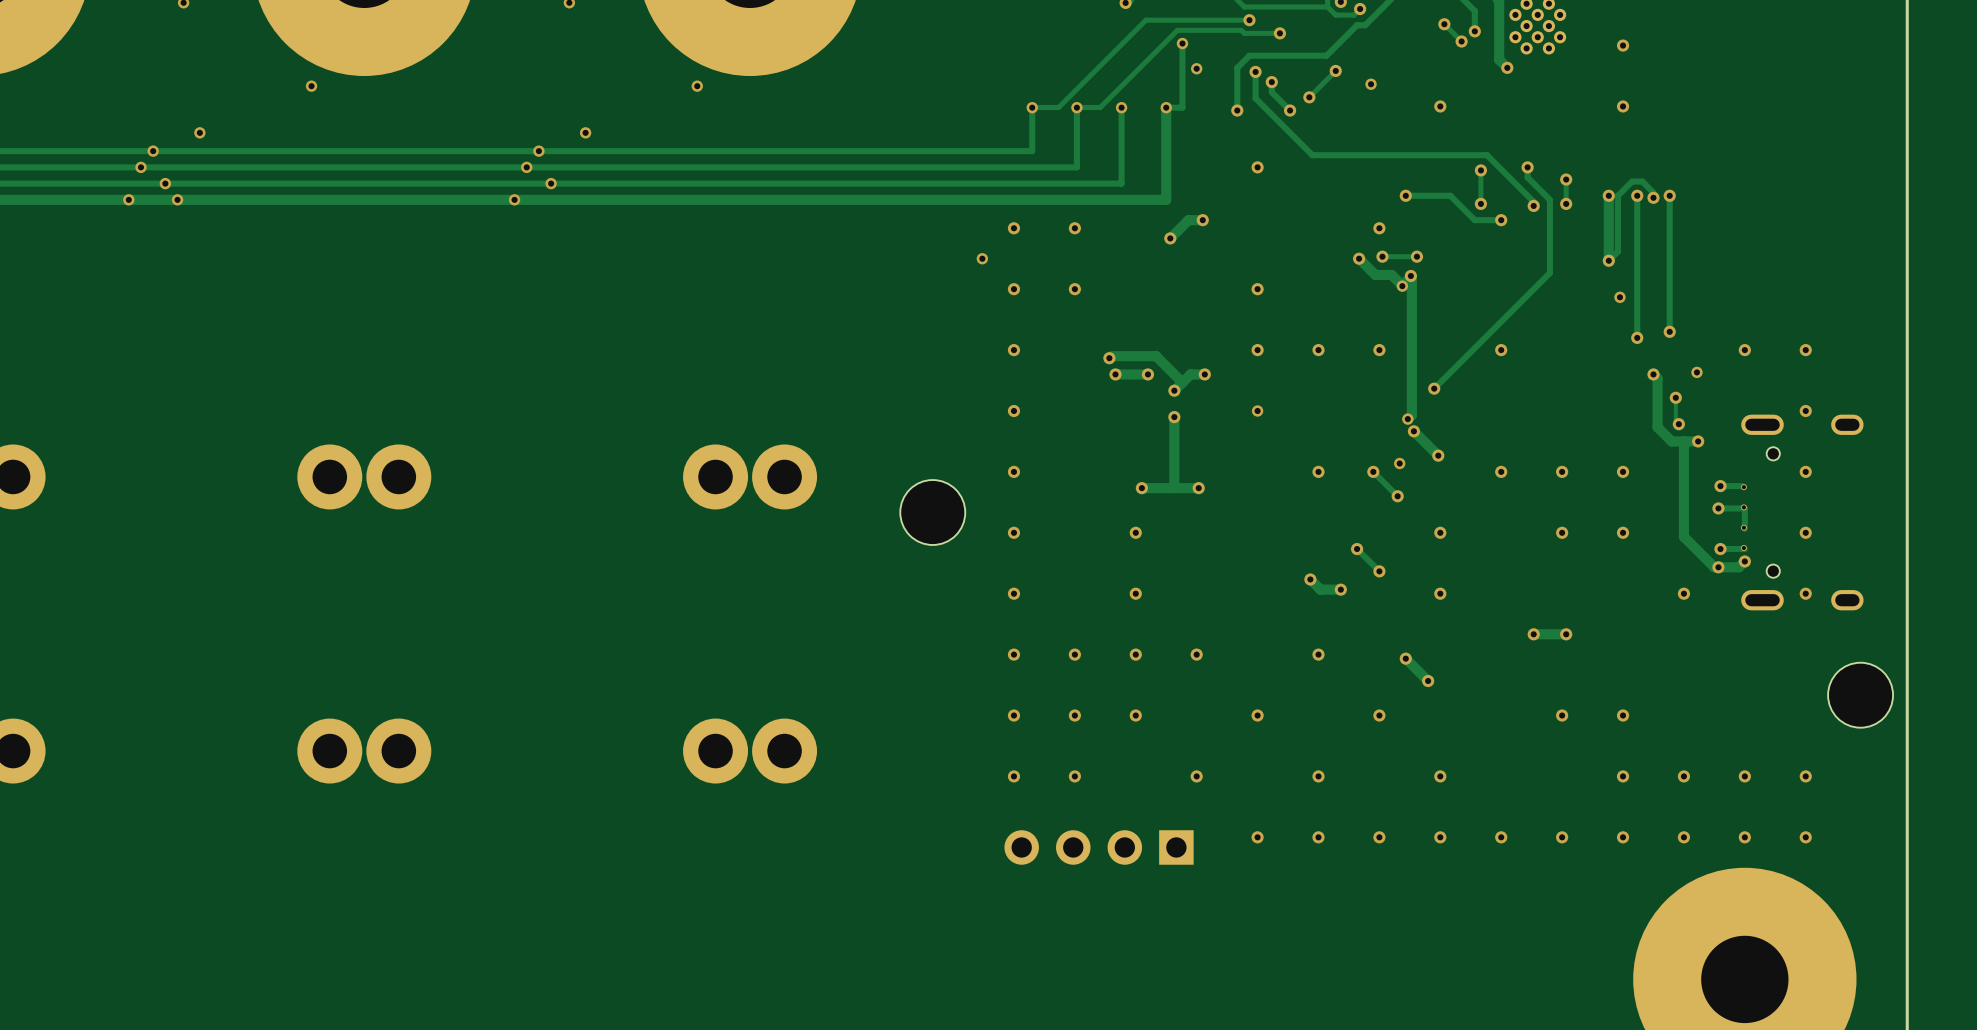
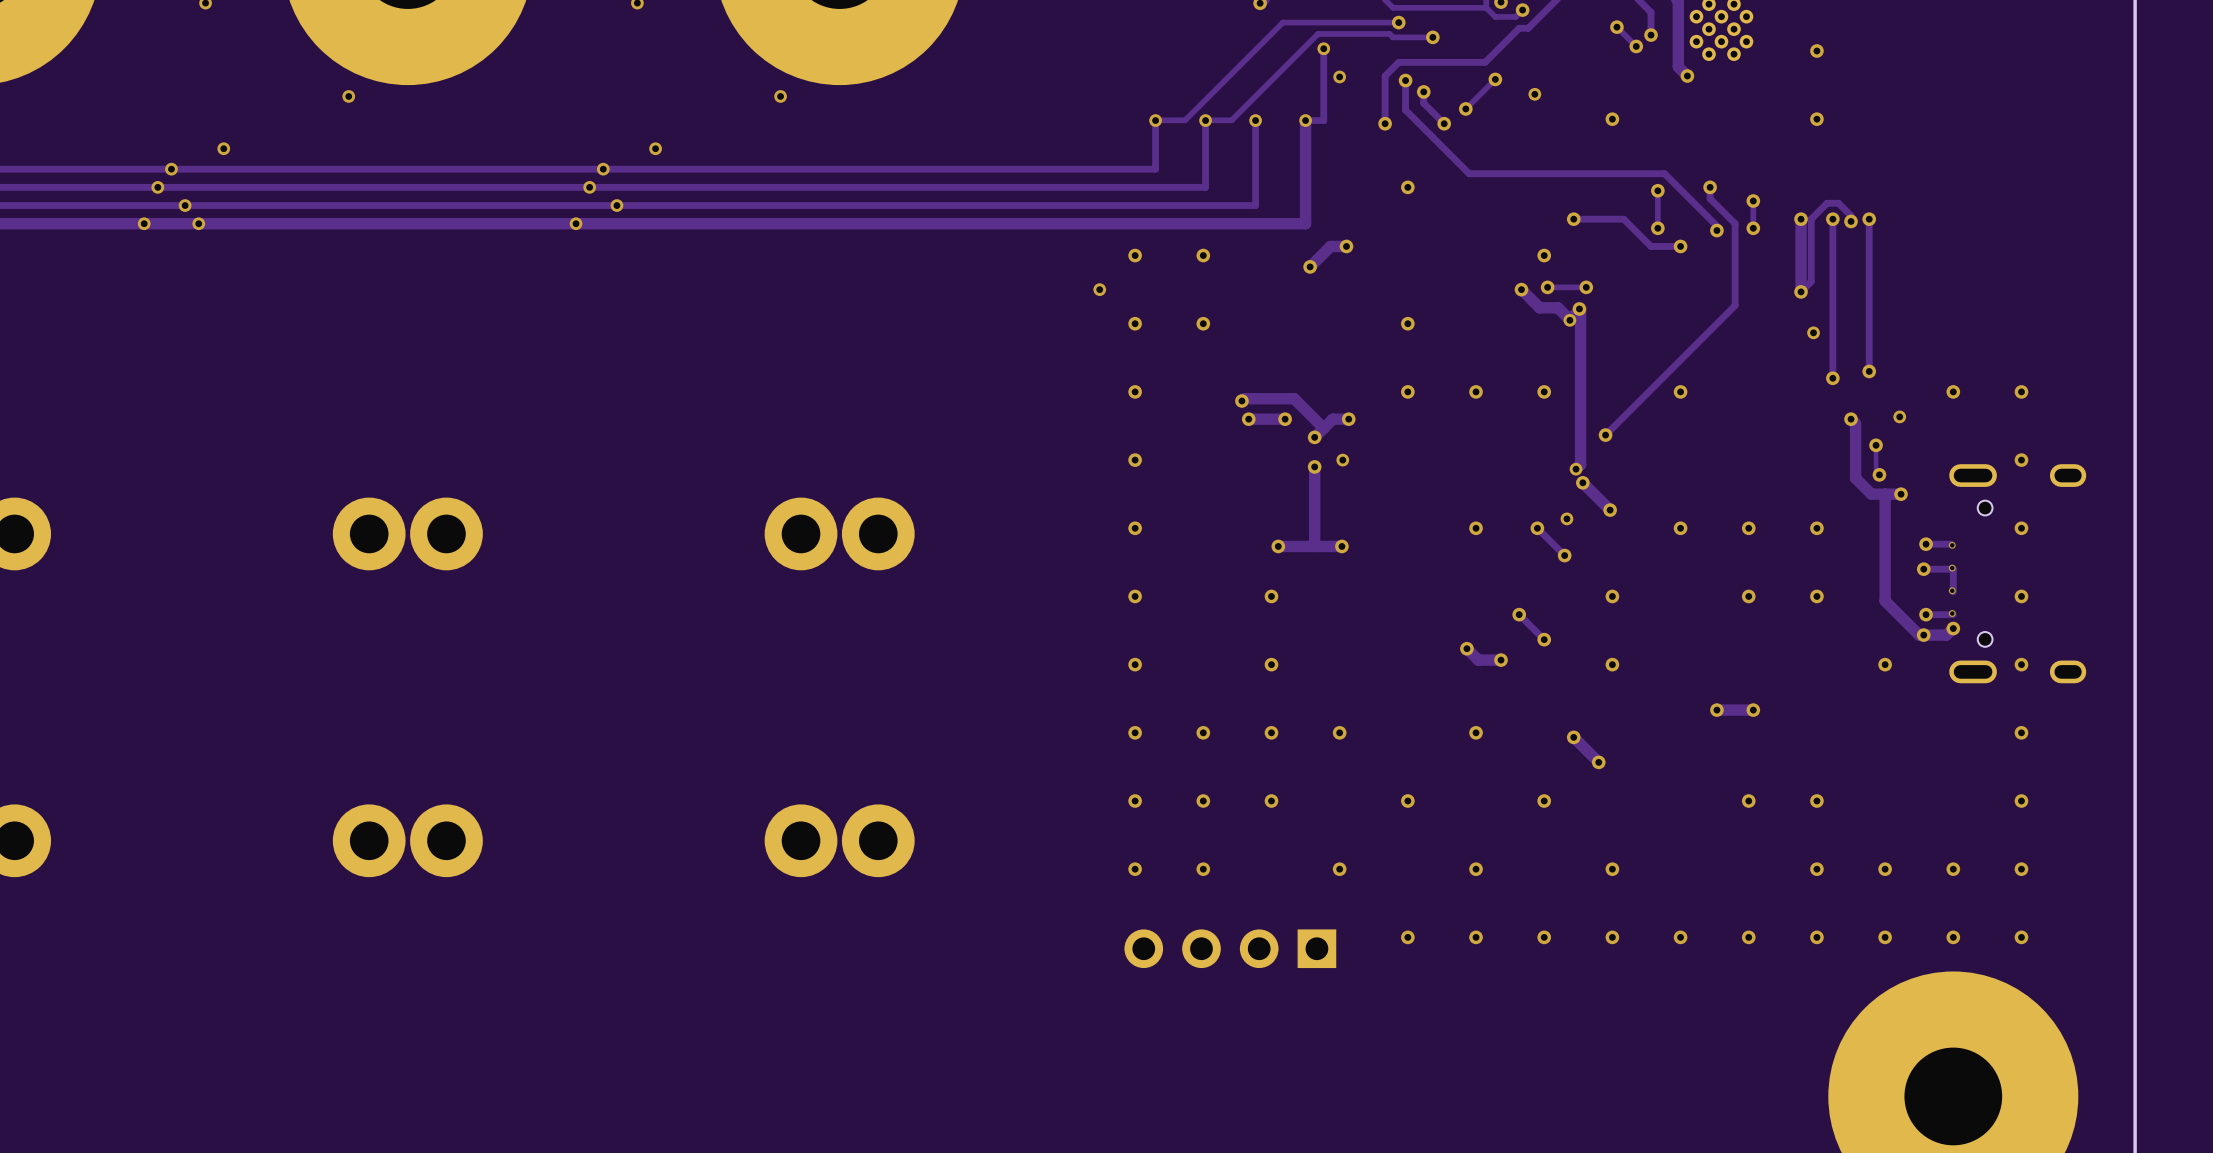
via position: (1257, 410) -> (1342, 460)
part: (932, 512) -> none
via: none -> (2021, 732)
part: (1860, 695) -> none
via: none -> (2021, 801)

